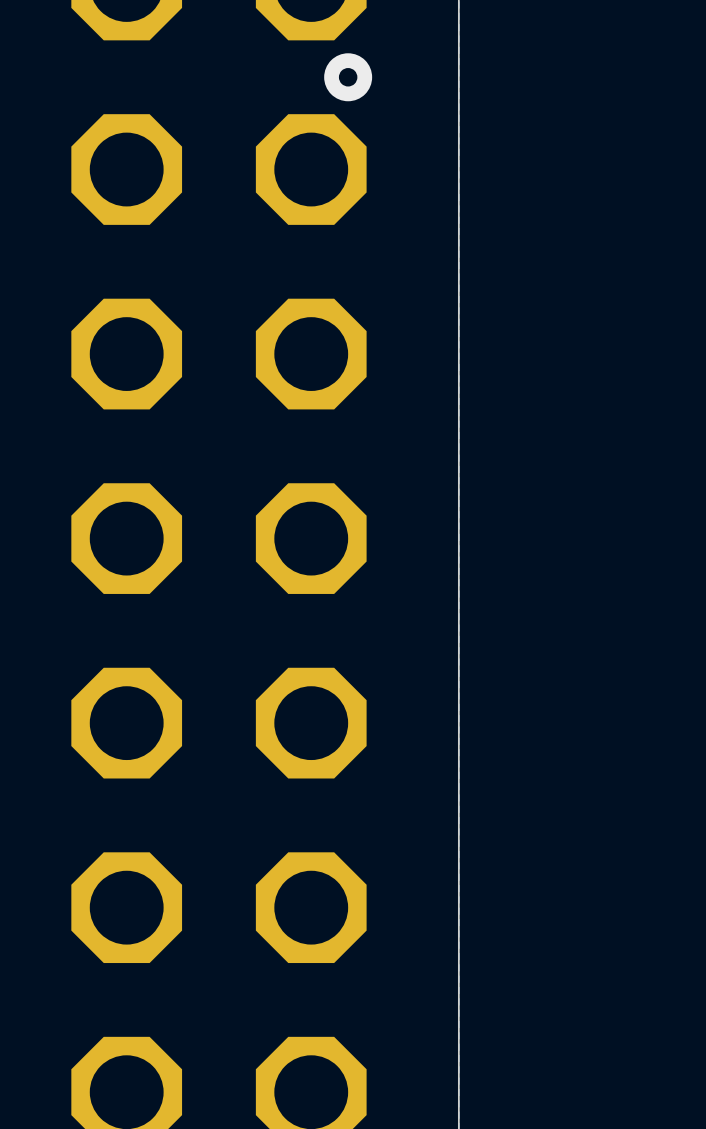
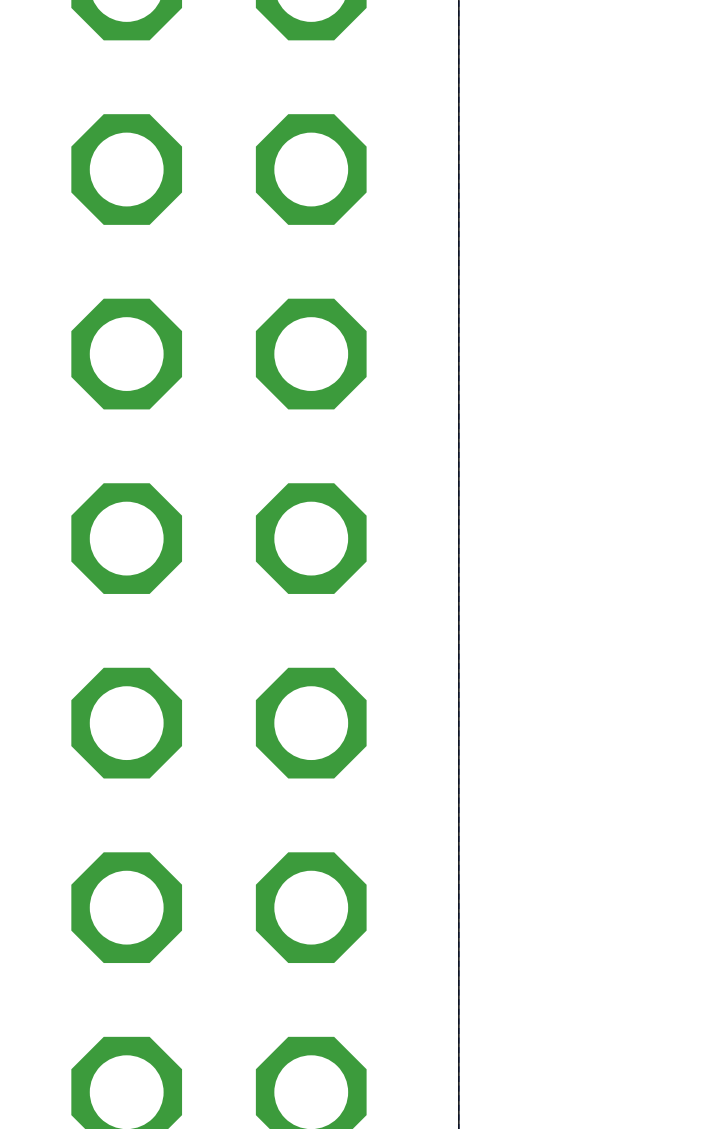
via: (348, 77) -> none

